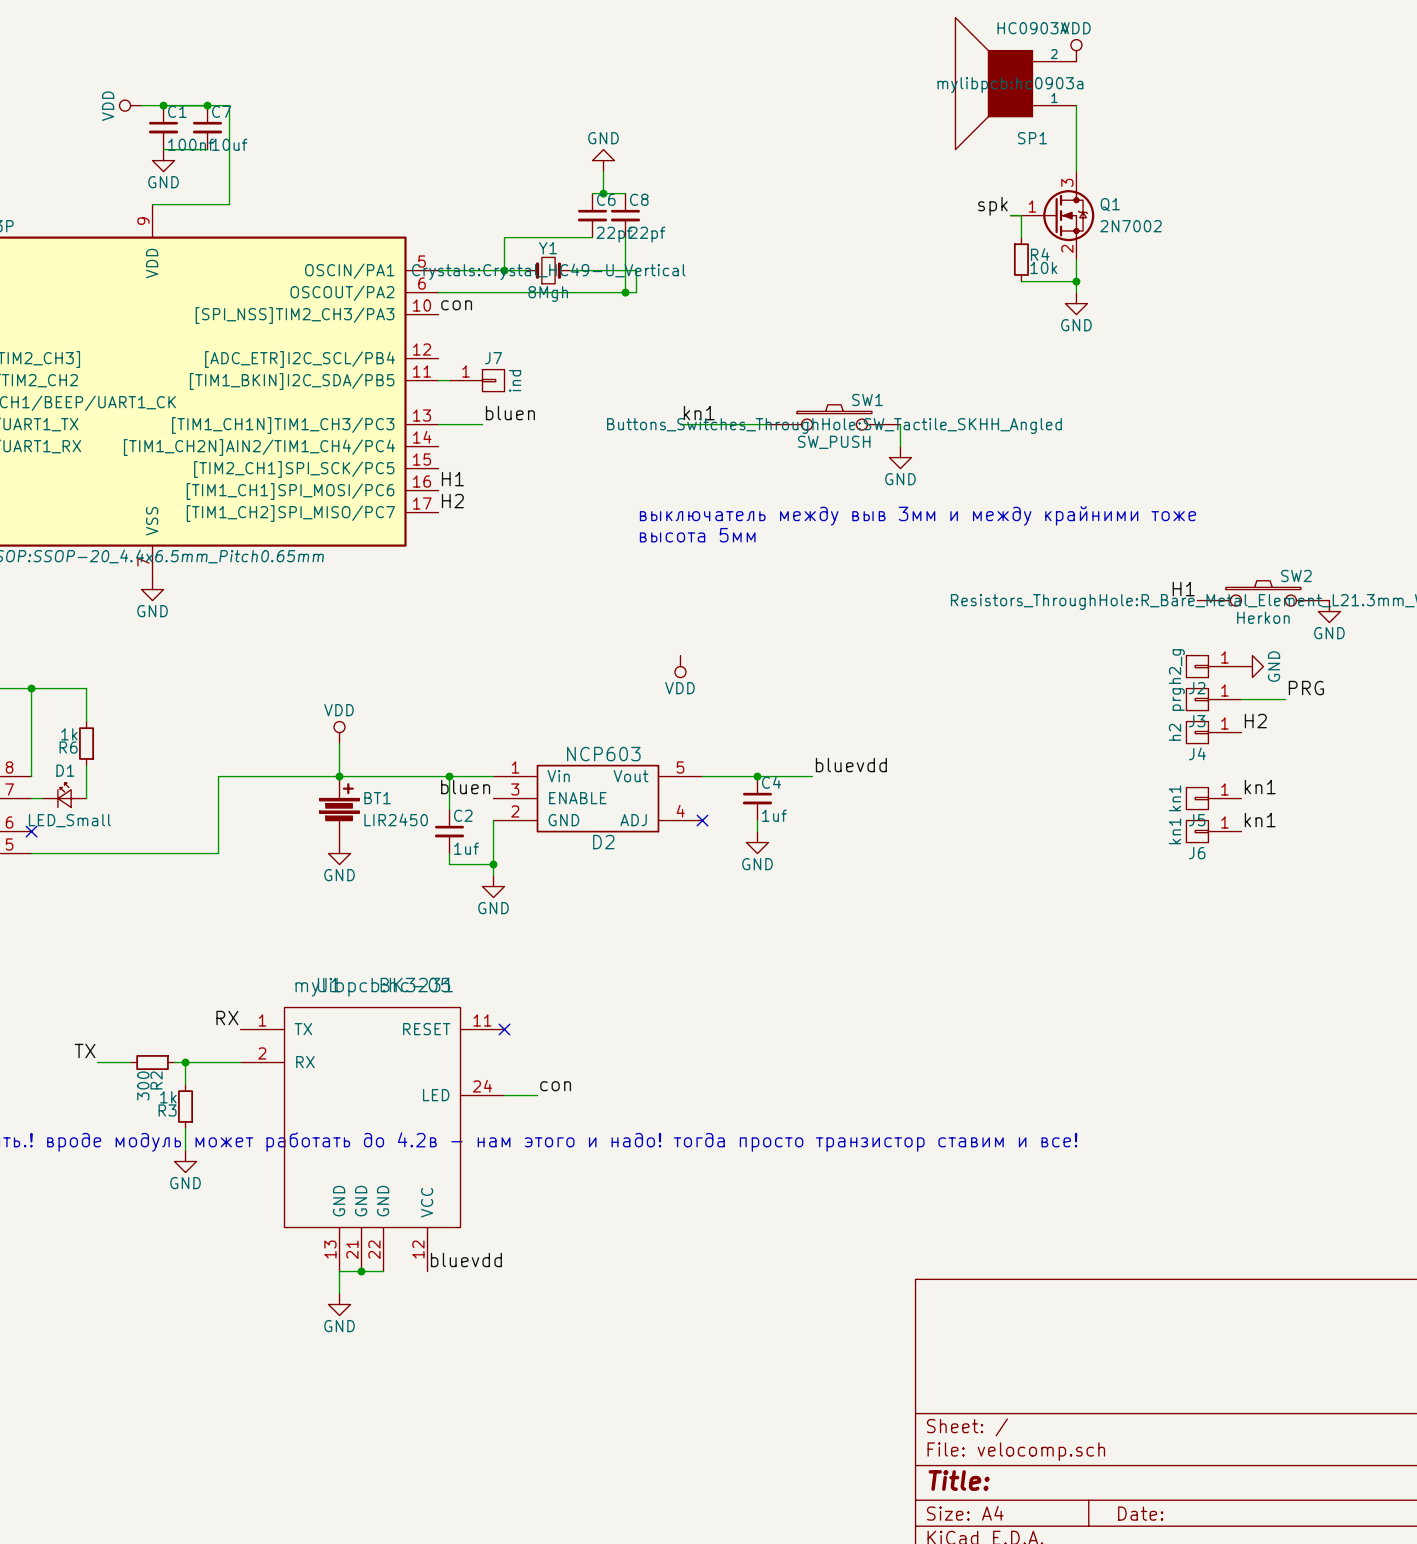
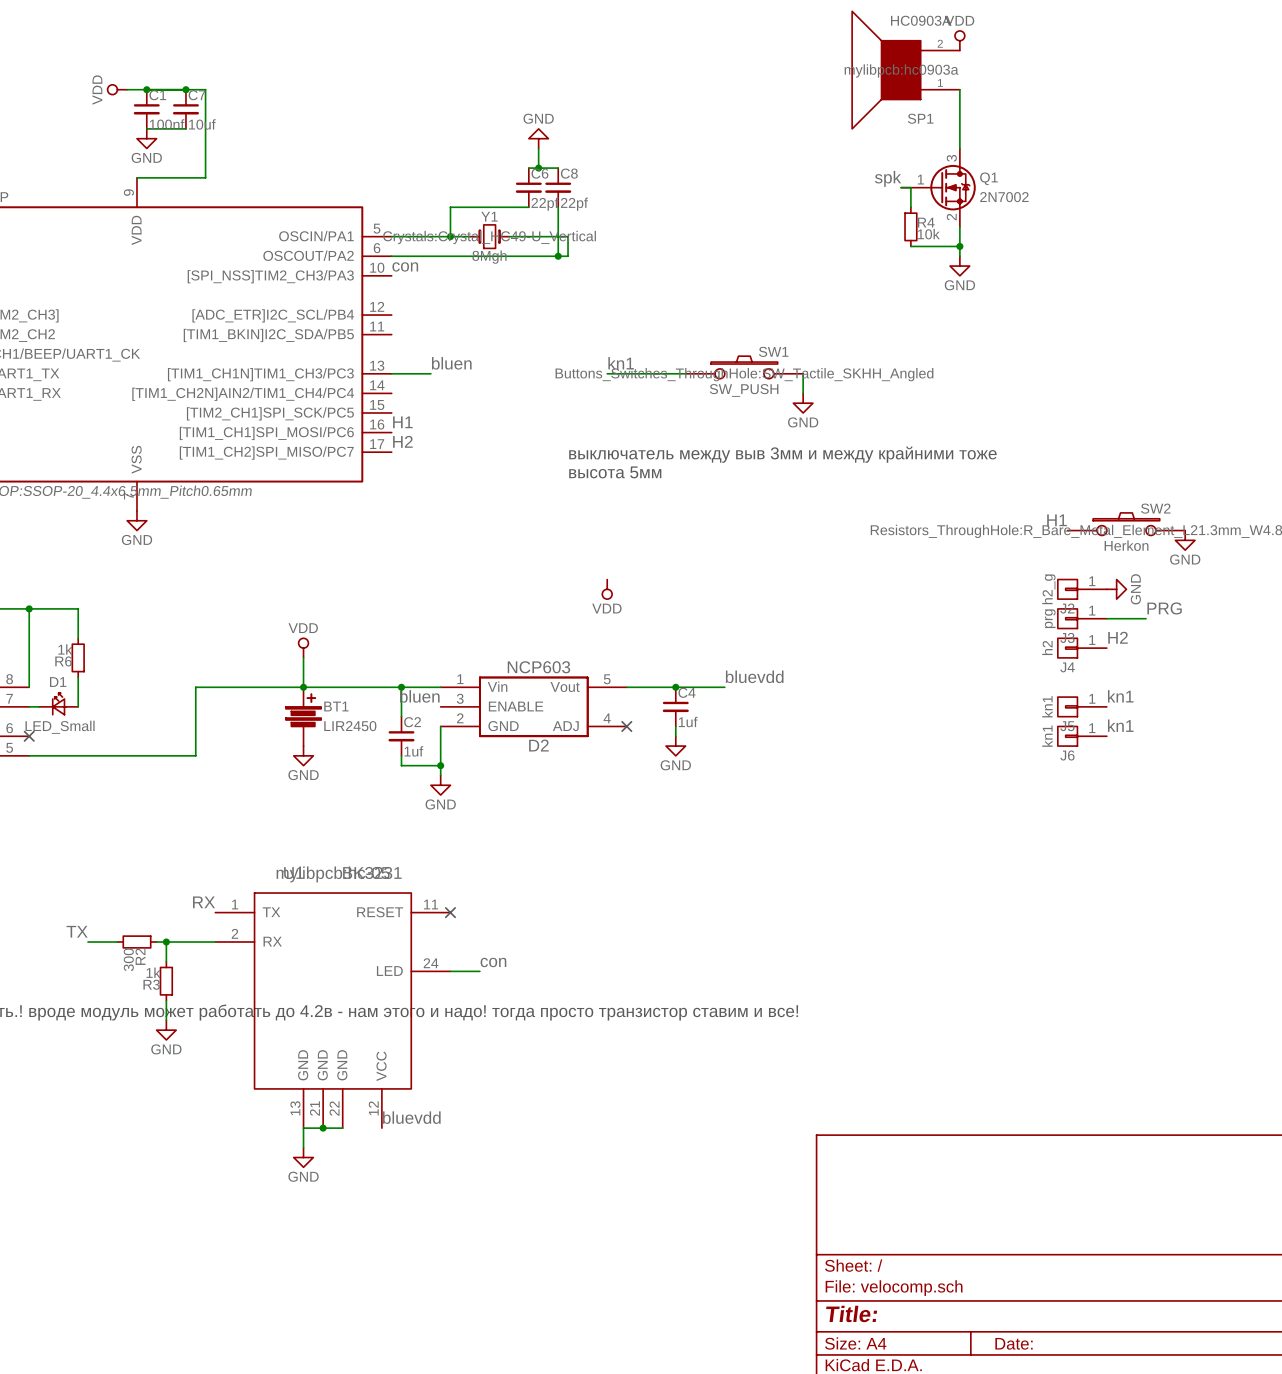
wire: (438, 380) (449, 380) -> none
J7: ind (477, 380) -> none

